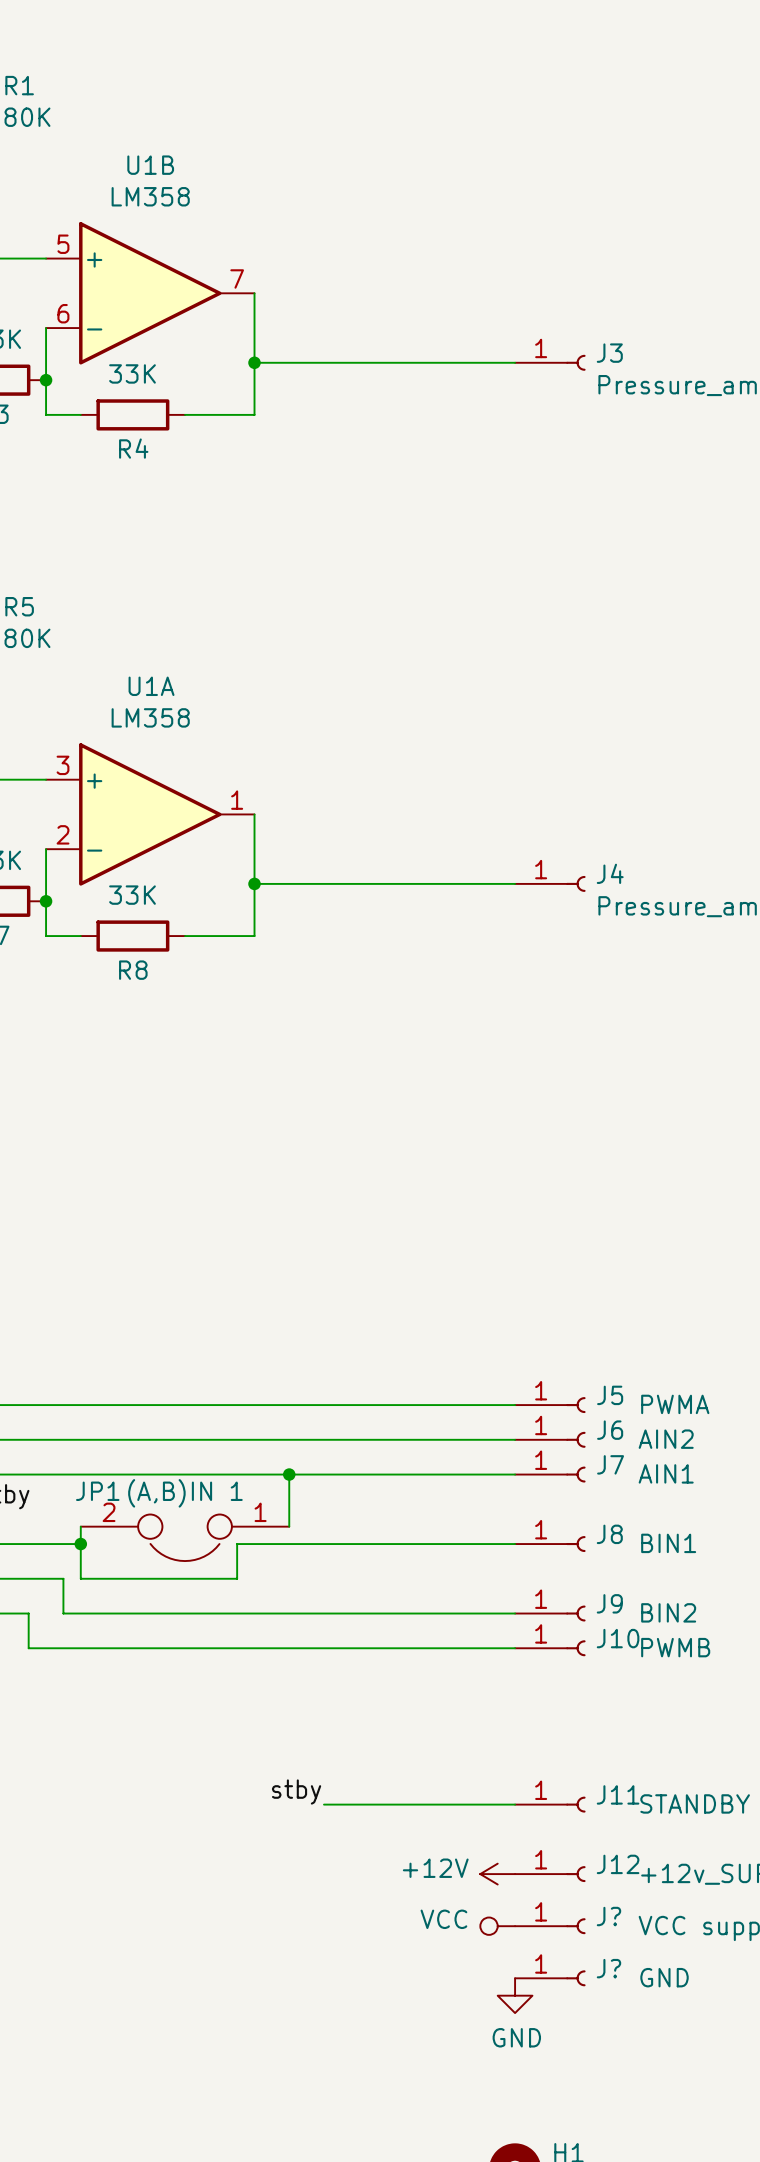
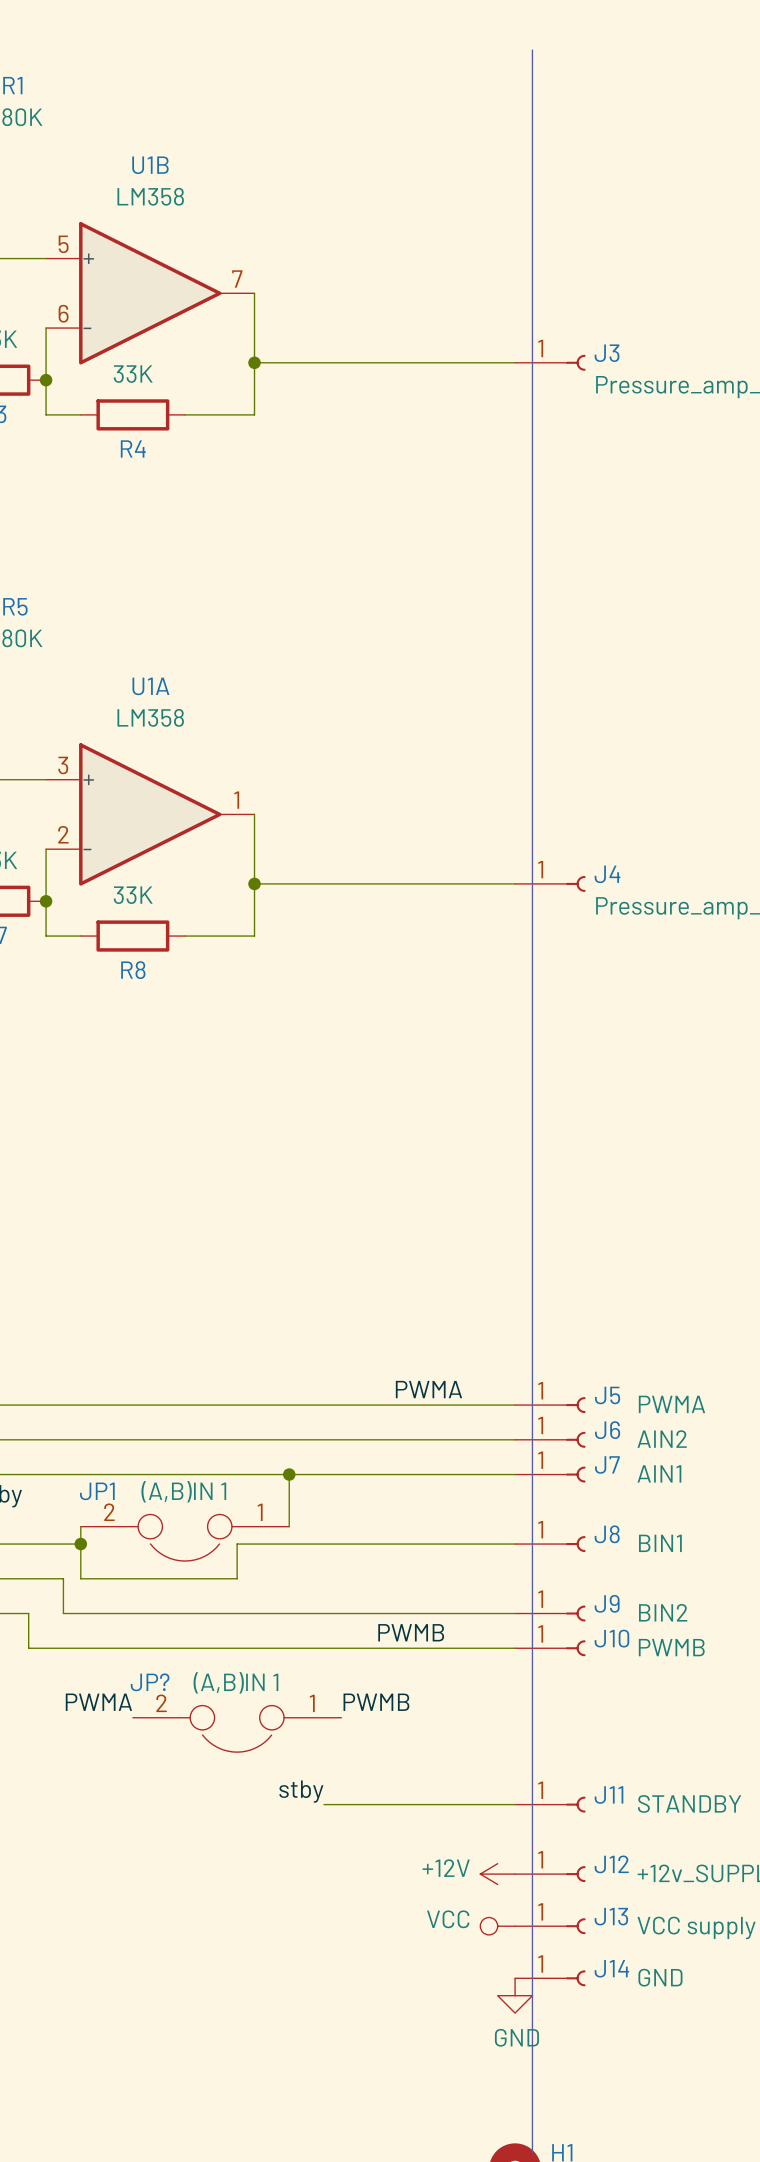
bus: none -> (532, 50) (532, 2152)
label: none -> PWMA (428, 1389)
label: none -> PWMB (411, 1632)
label: none -> PWMA (98, 1702)
label: none -> PWMB (376, 1702)
JP?: none -> (A,B)IN 1 (237, 1728)
J? name: J? (608, 1916) -> J13 (611, 1916)
J? name: J? (608, 1968) -> J14 (611, 1968)

